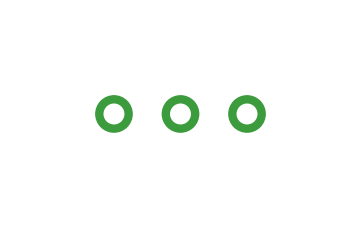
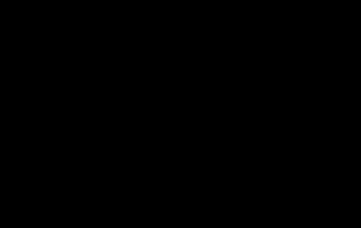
part: (180, 113) -> none

